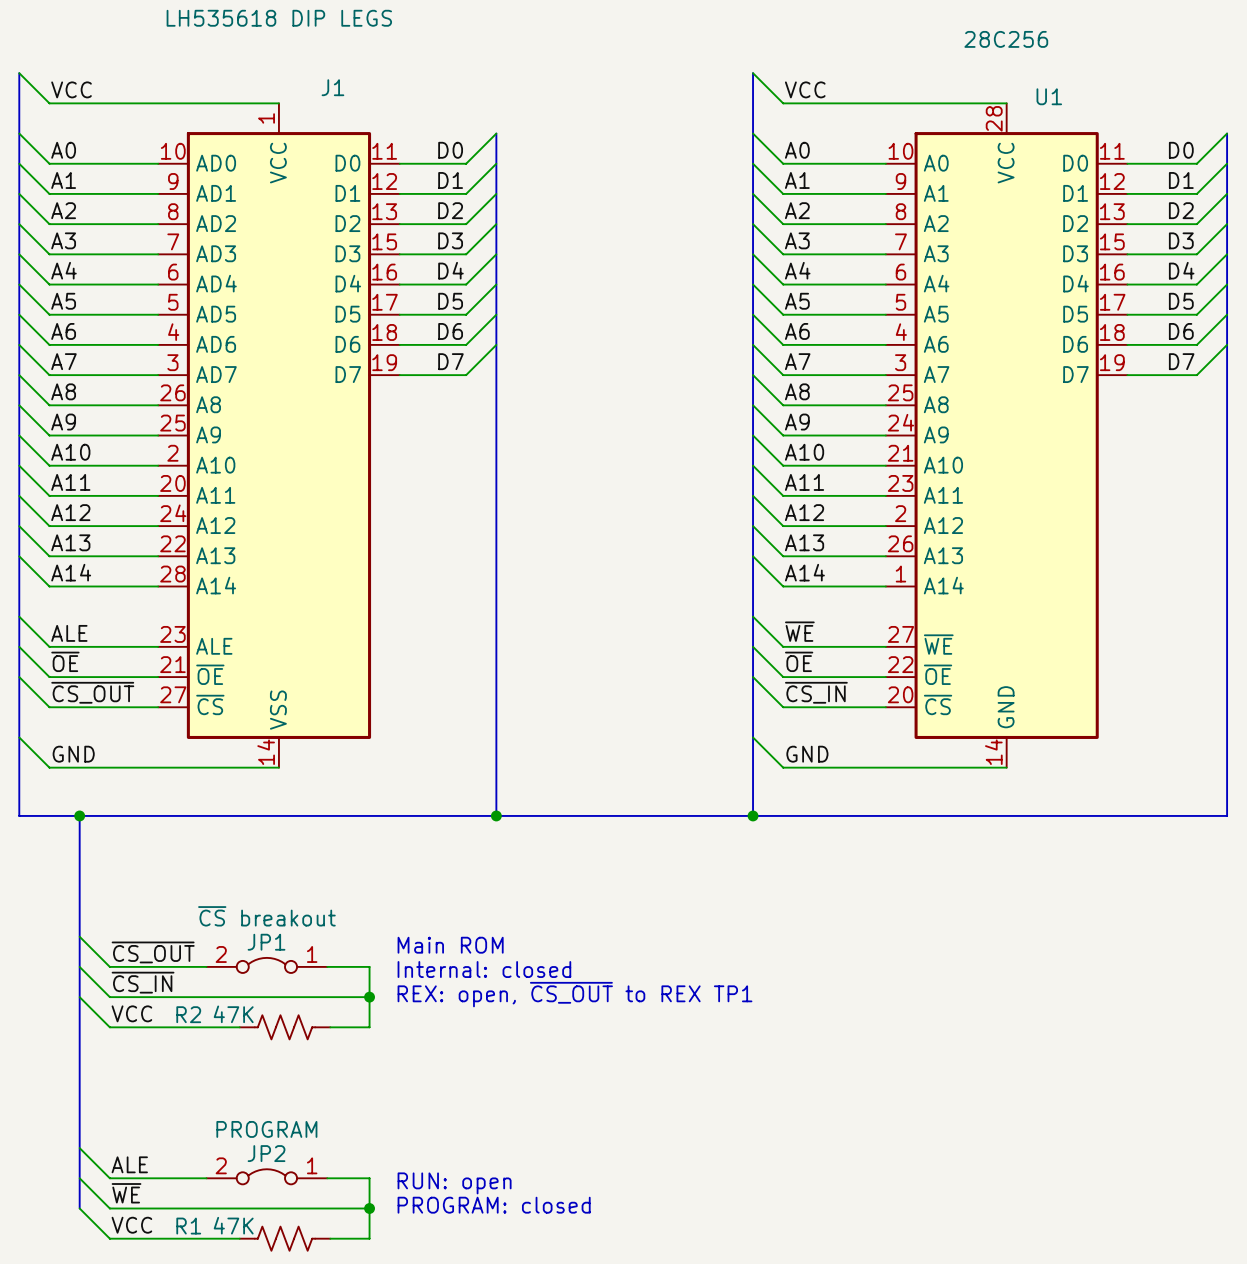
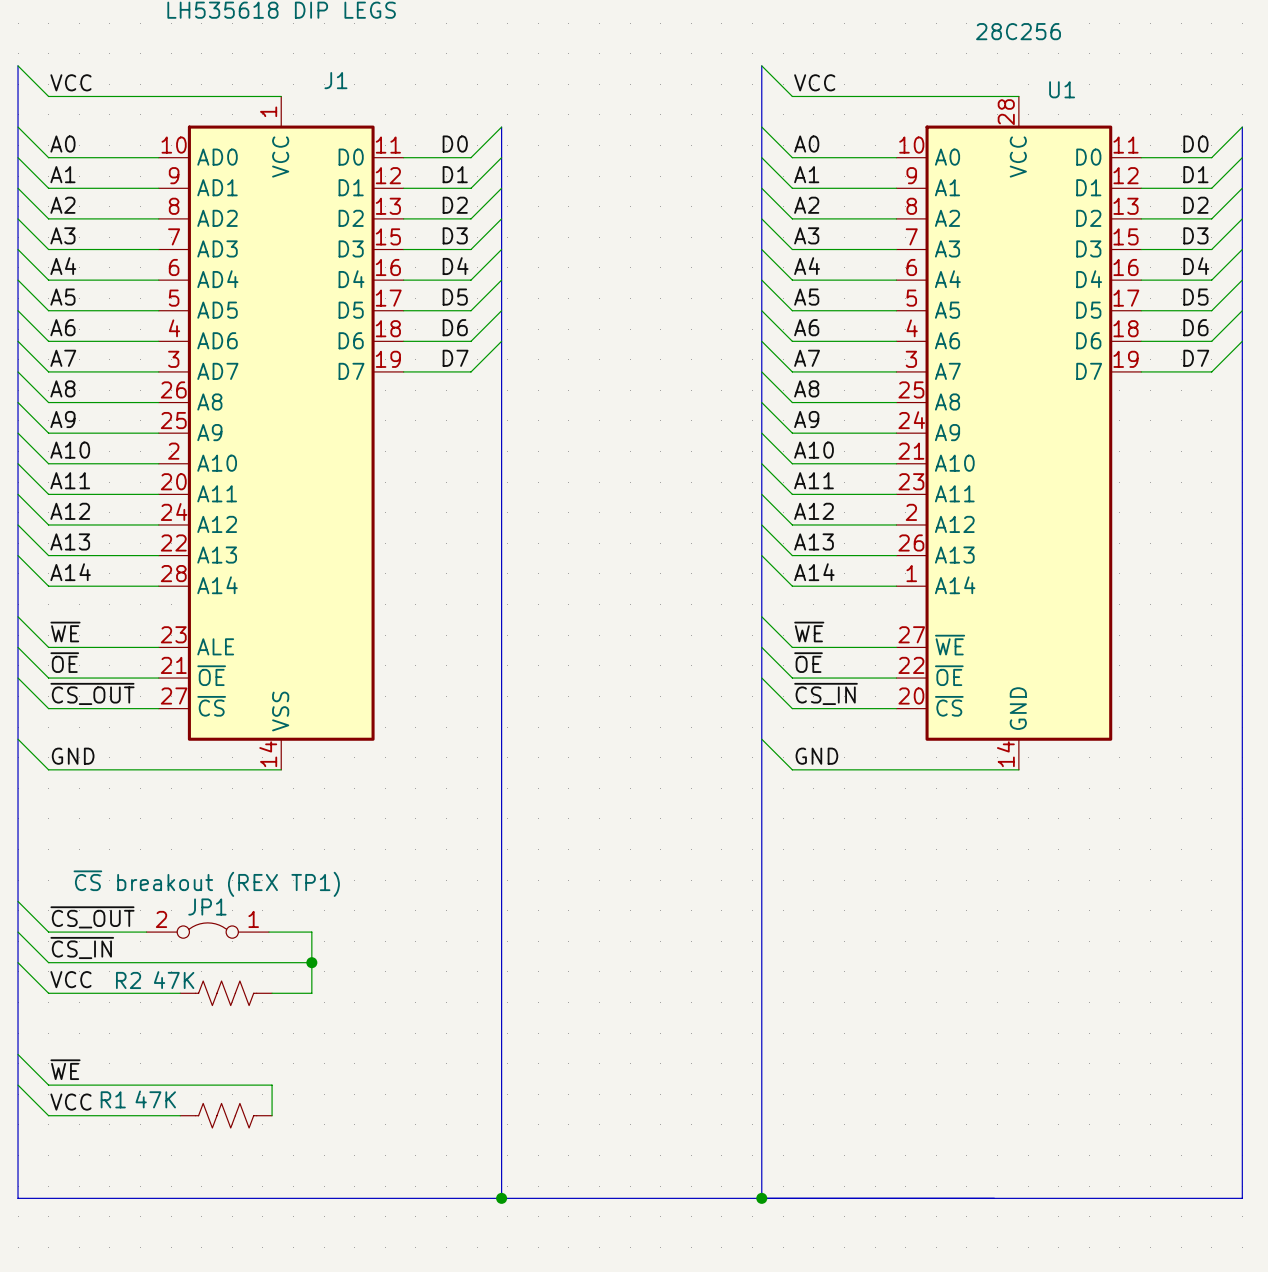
label: ALE (69, 633) -> ~{WE} (65, 632)
bus: (19, 815) (1227, 815) -> (18, 818) (18, 1198) (1242, 1198) (1242, 818)
bus: (79, 815) (79, 1208) -> none
junction: (79, 815) -> none
bus: none -> (501, 818) (501, 1198)
junction: (496, 815) -> none
bus: none -> (761, 818) (761, 1198)
junction: (753, 815) -> none
JP1 value: ~{CS} breakout (266, 916) -> ~{CS} breakout (REX TP1) (206, 883)
wire: (79, 936) (109, 966) (206, 966) -> (18, 901) (48, 932) (146, 932)
text: Main ROM (450, 945) -> none
label position: ~{CS_OUT} (153, 952) -> ~{CS_OUT} (92, 917)
junction: none -> (311, 962)
JP1 position: (266, 965) -> (207, 930)
wire: (79, 966) (109, 997) (369, 997) -> (18, 932) (48, 962) (311, 962)
wire: (327, 966) (369, 966) (369, 1027) (330, 1027) -> (268, 932) (311, 932) (311, 993) (272, 993)
text: Internal: closed (484, 969) -> none
label: none -> VCC (70, 979)
label position: ~{CS_IN} (143, 982) -> ~{CS_IN} (82, 947)
text: REX: open, ~{CS_OUT} to REX TP1 (574, 994) -> none
wire: (79, 997) (109, 1027) (239, 1027) -> (18, 962) (48, 993) (180, 993)
junction: (369, 997) -> none
label: VCC (131, 1013) -> none
R2 position: (285, 1027) -> (226, 993)
wire: none -> (18, 1054) (48, 1085) (272, 1085) (272, 1115)
label: none -> VCC (70, 1102)
wire: (79, 1148) (109, 1178) (206, 1178) -> none
label: ALE (129, 1164) -> none
JP2: PROGRAM (266, 1176) -> none
wire: (79, 1178) (109, 1208) (369, 1208) -> none
wire: (327, 1178) (369, 1178) (369, 1238) (330, 1238) -> none
text: RUN: open (454, 1183) -> none
junction: none -> (501, 1198)
junction: none -> (761, 1198)
label position: ~{WE} (126, 1193) -> ~{WE} (65, 1069)
text: PROGRAM: closed (494, 1205) -> none
wire: (79, 1208) (109, 1238) (239, 1238) -> (18, 1085) (48, 1115) (180, 1115)
junction: (369, 1208) -> none
label: VCC (131, 1225) -> none
R1 value position: 47K (233, 1225) -> 47K (155, 1099)
R1 name position: R1 (188, 1226) -> R1 (113, 1099)
R1 position: (285, 1238) -> (226, 1115)

